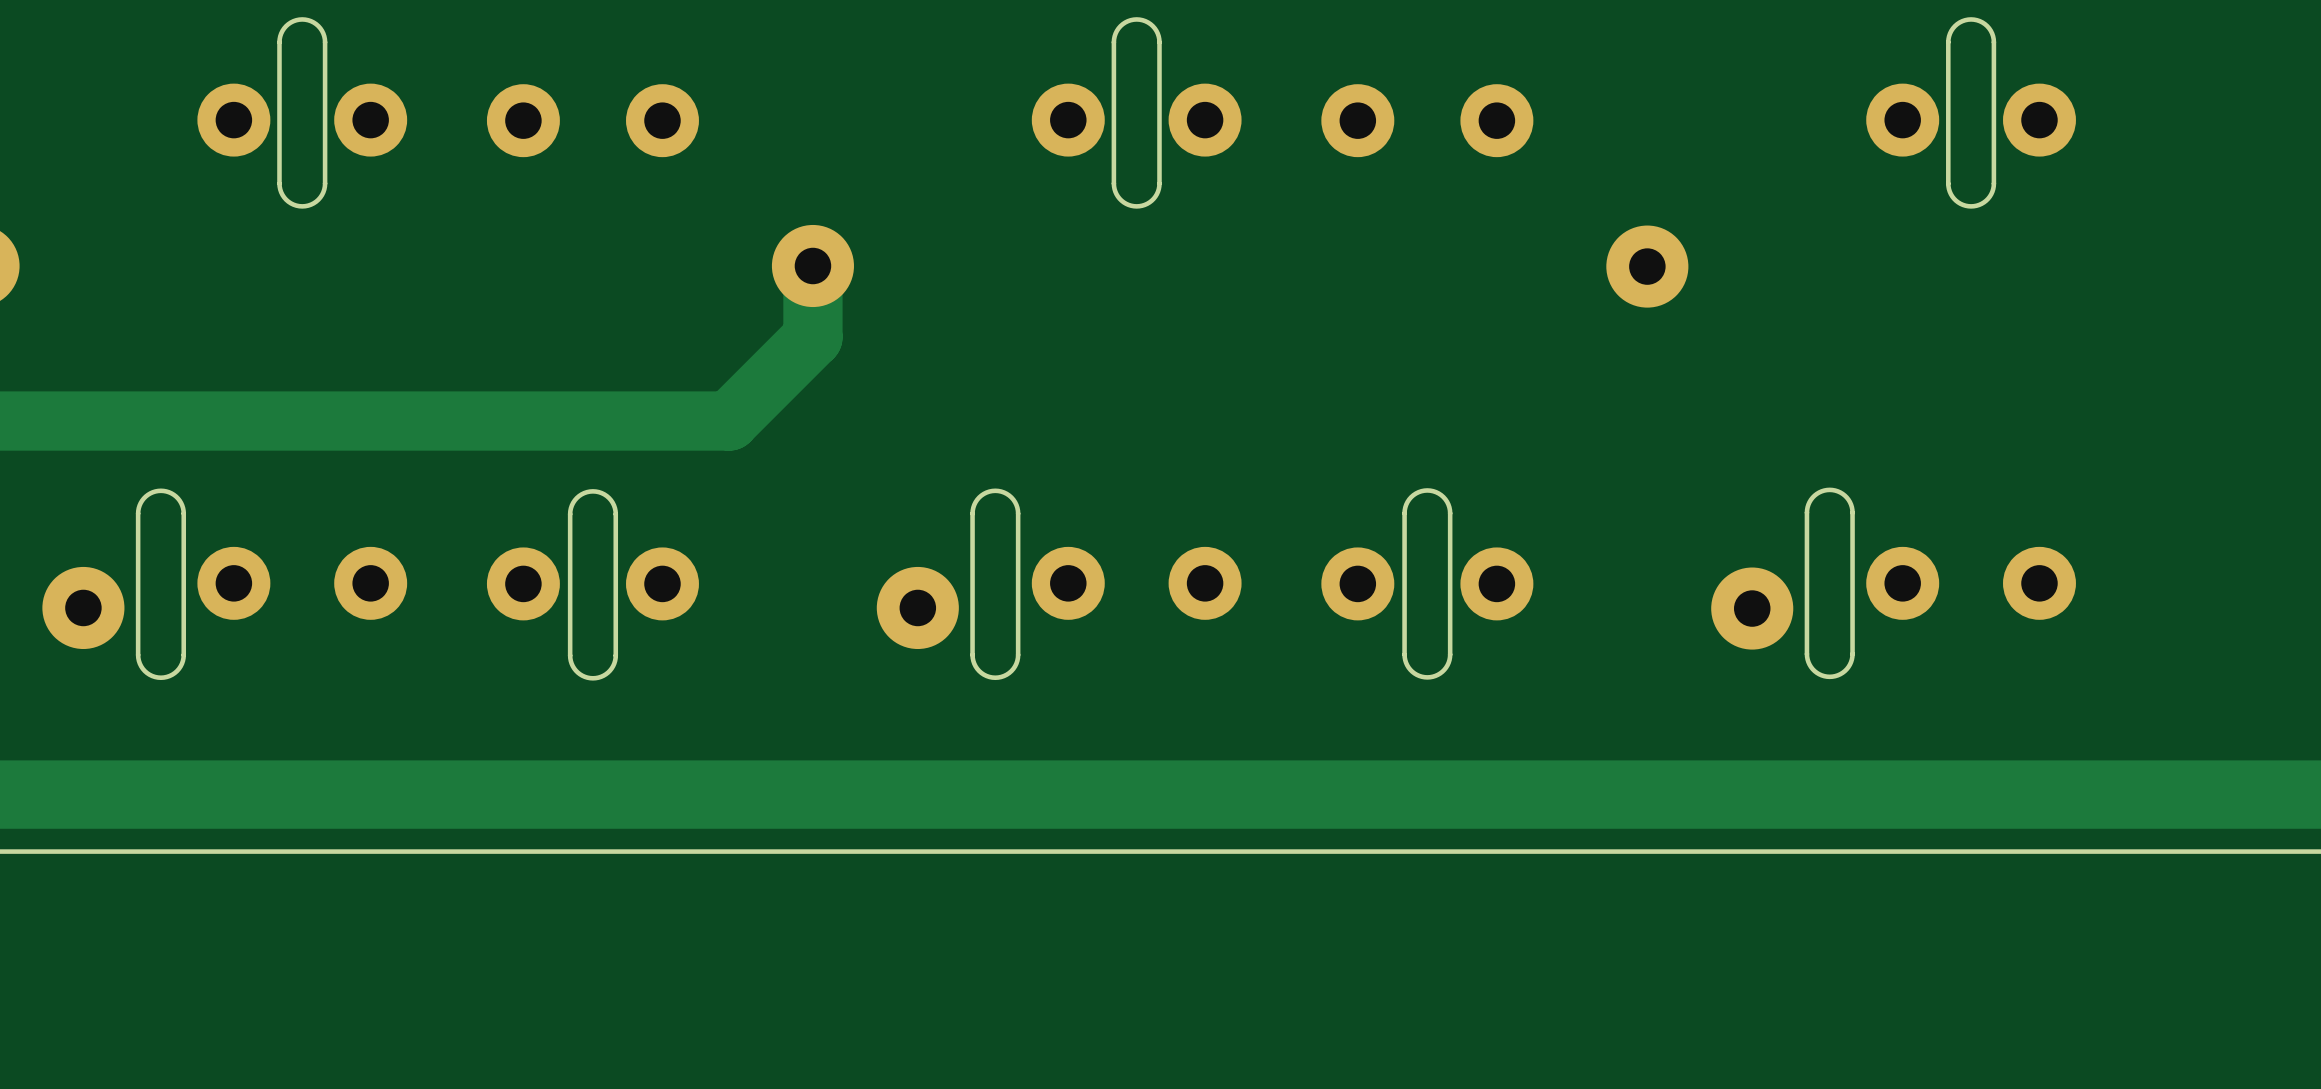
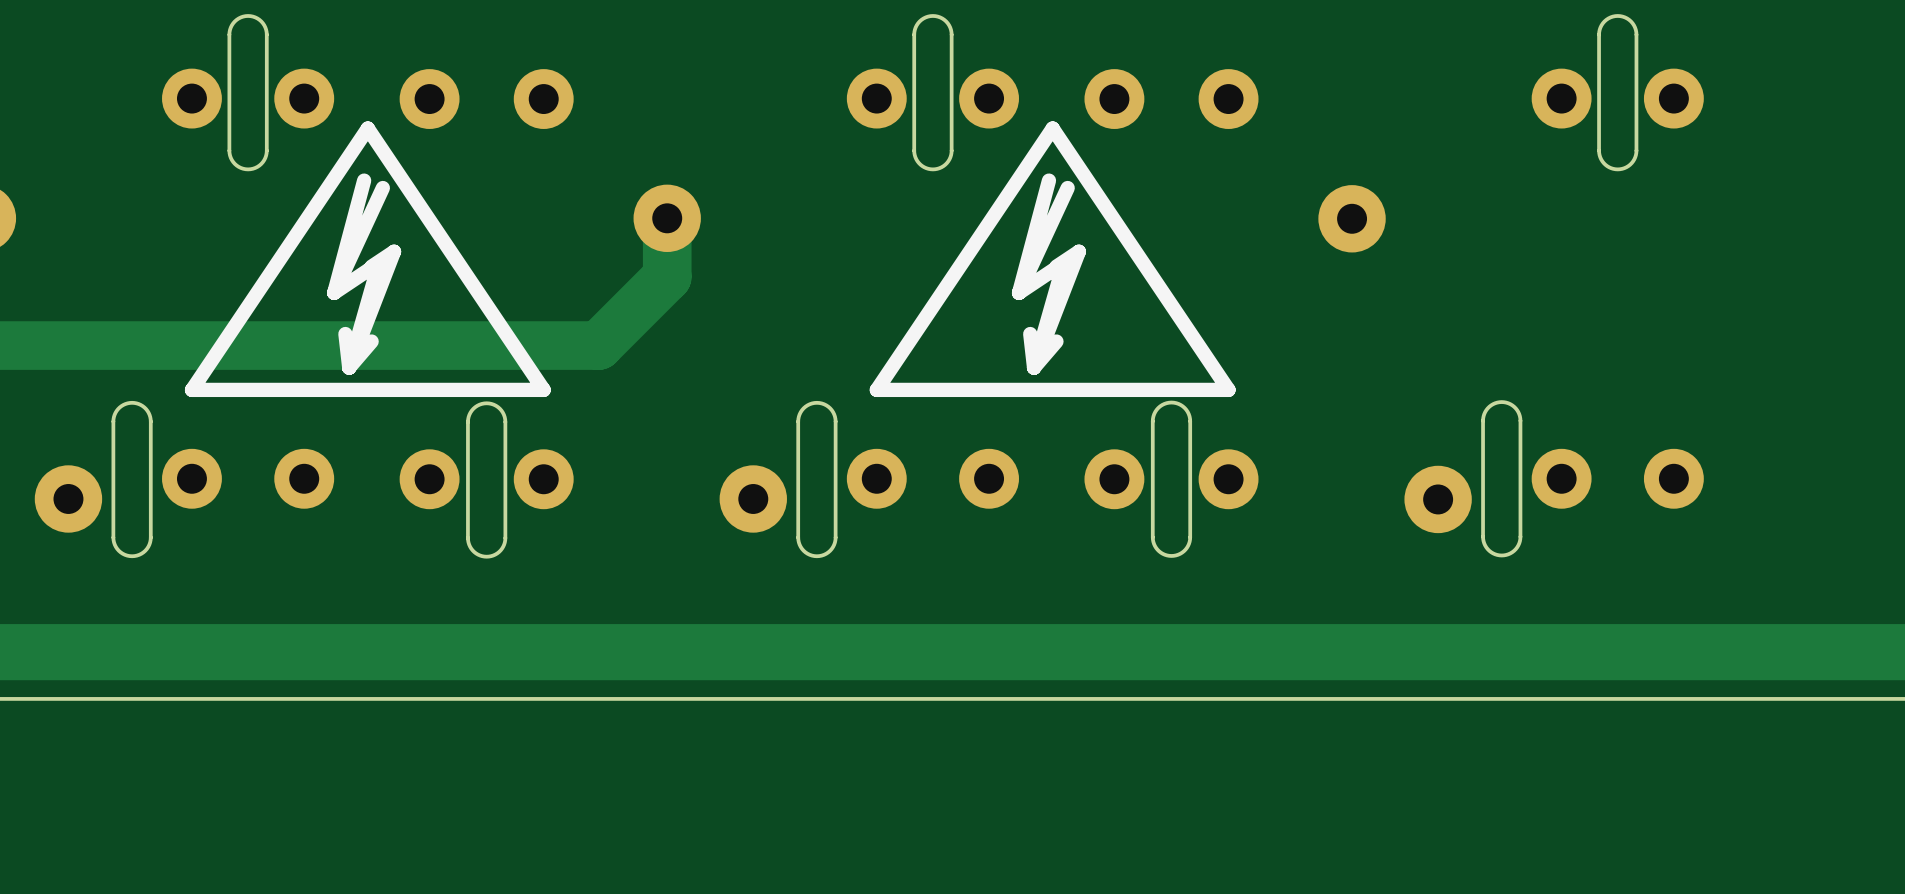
drawing: none -> [184, 121, 551, 398]
drawing: none -> [869, 121, 1236, 398]

